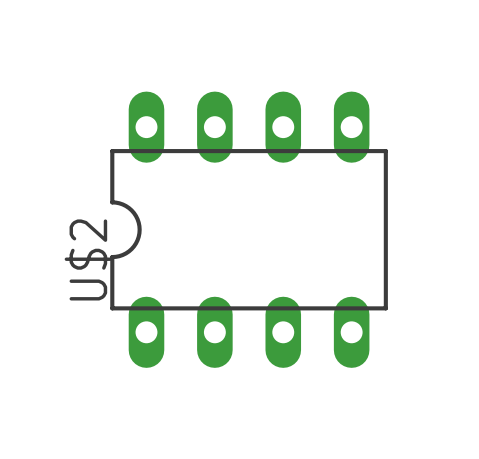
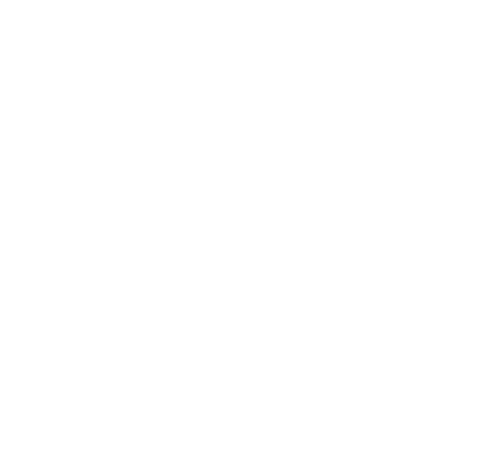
U$2: (249, 229) -> none

